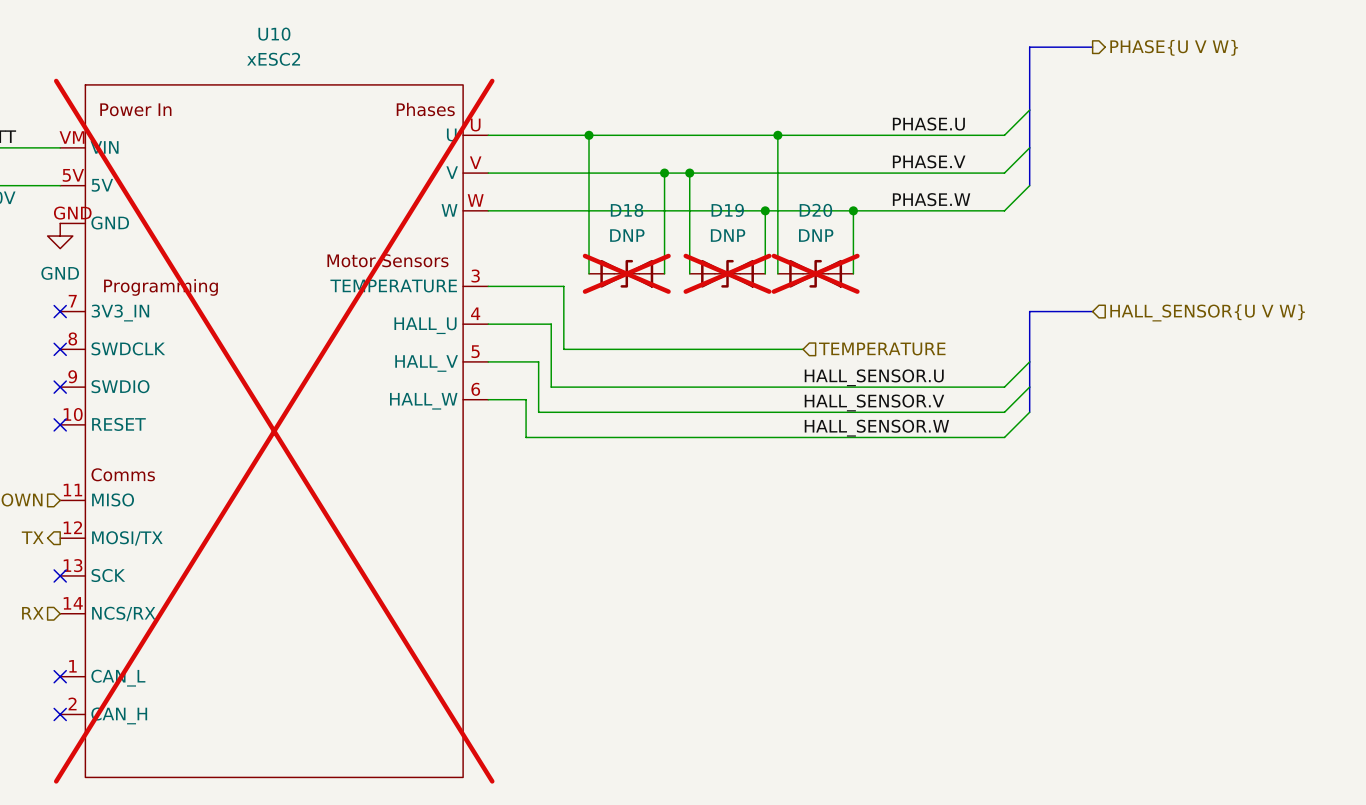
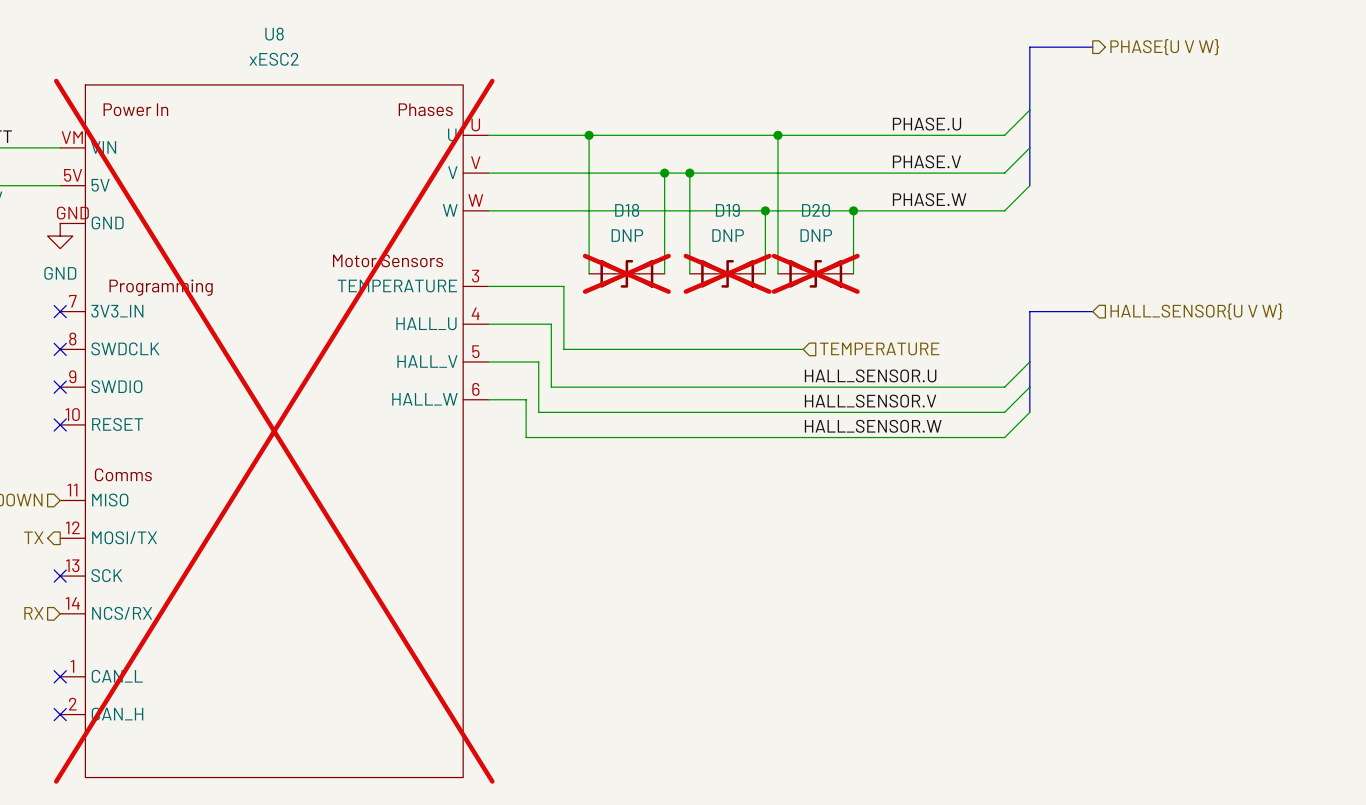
U10 name: U10 (274, 34) -> U8 (274, 34)

